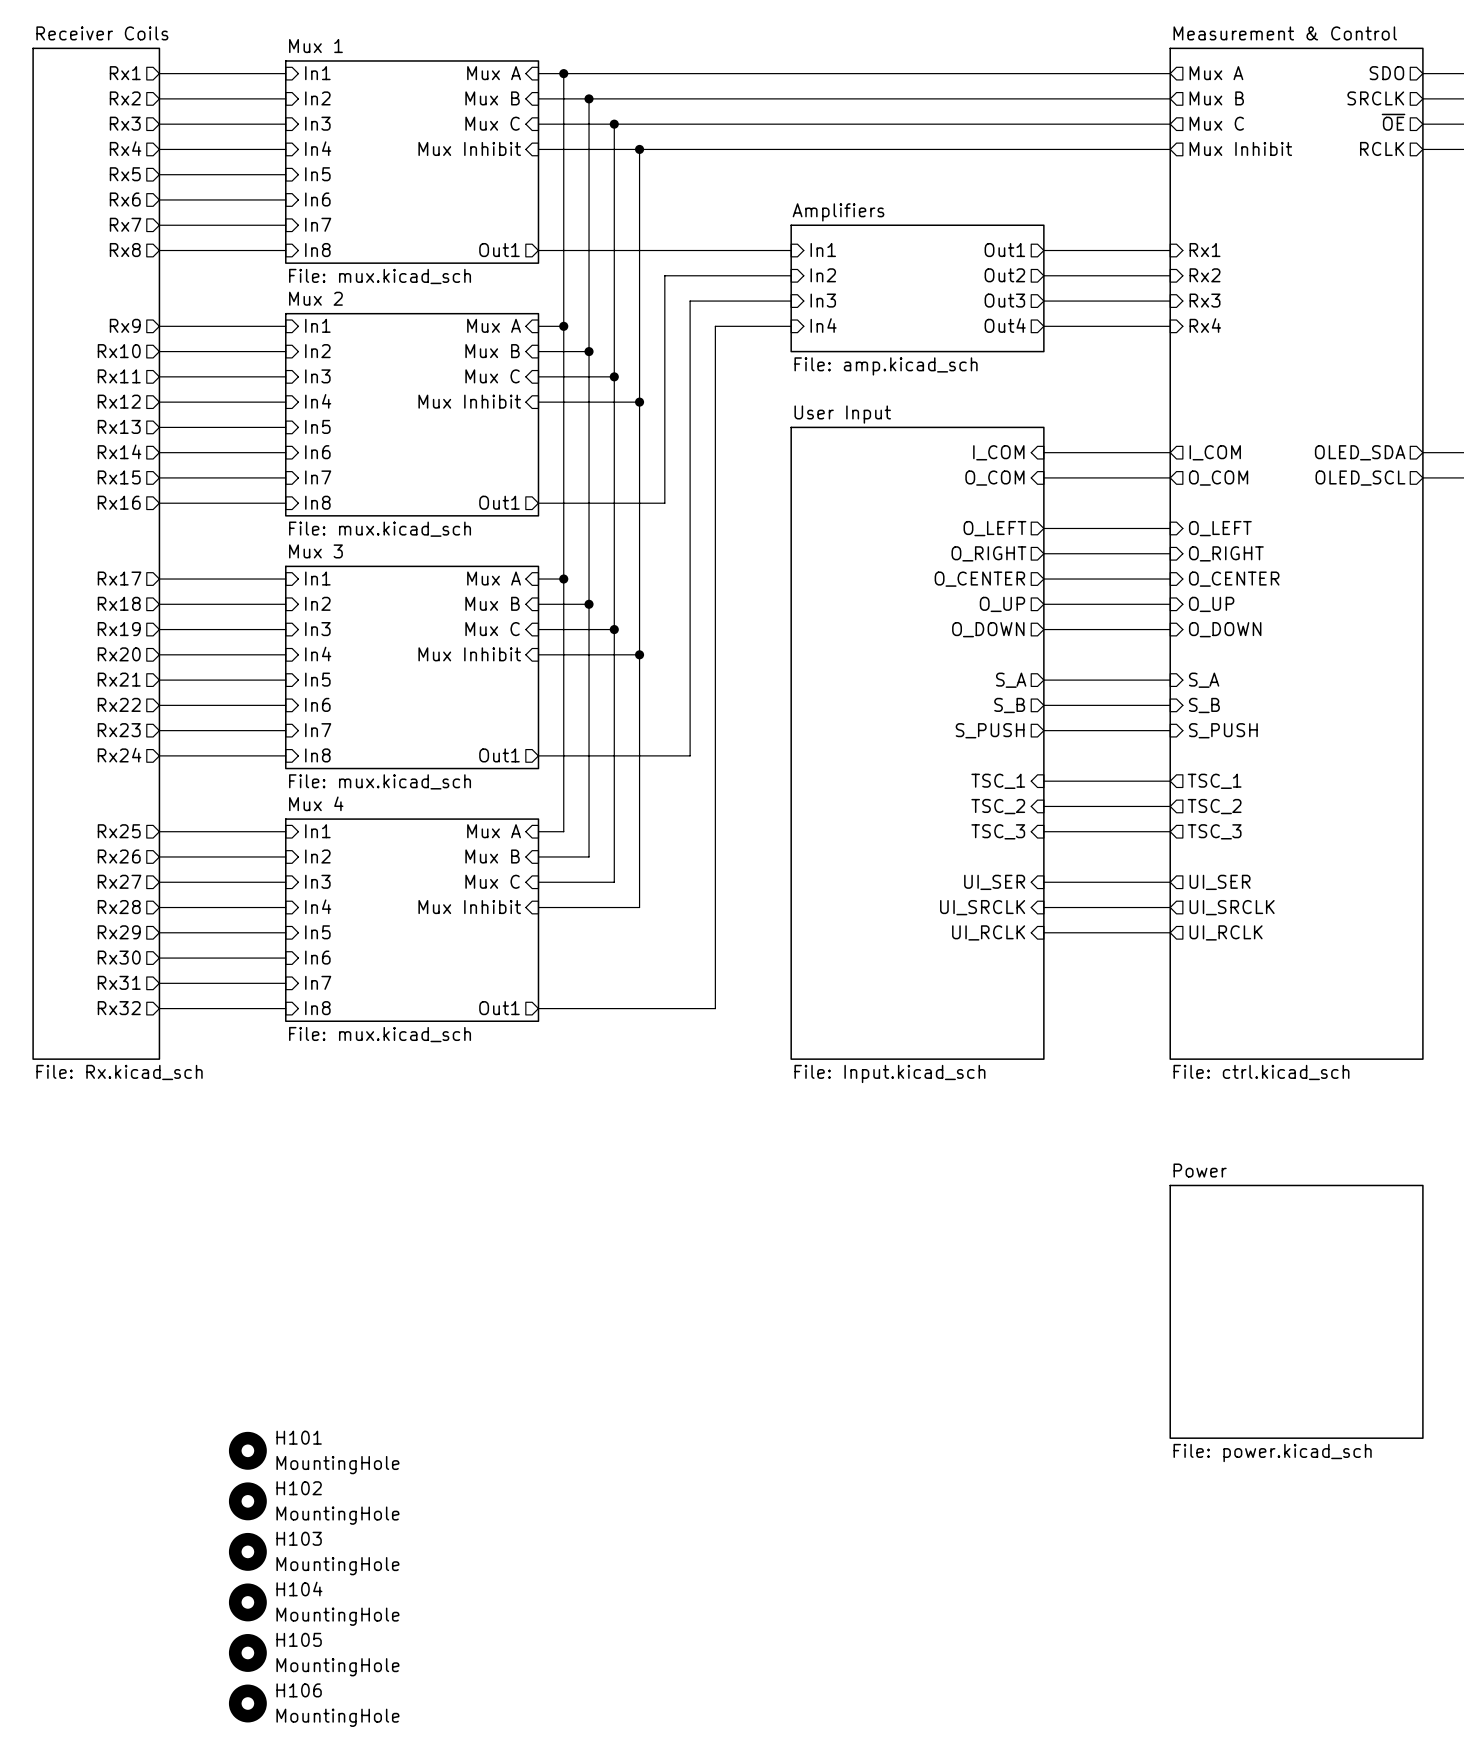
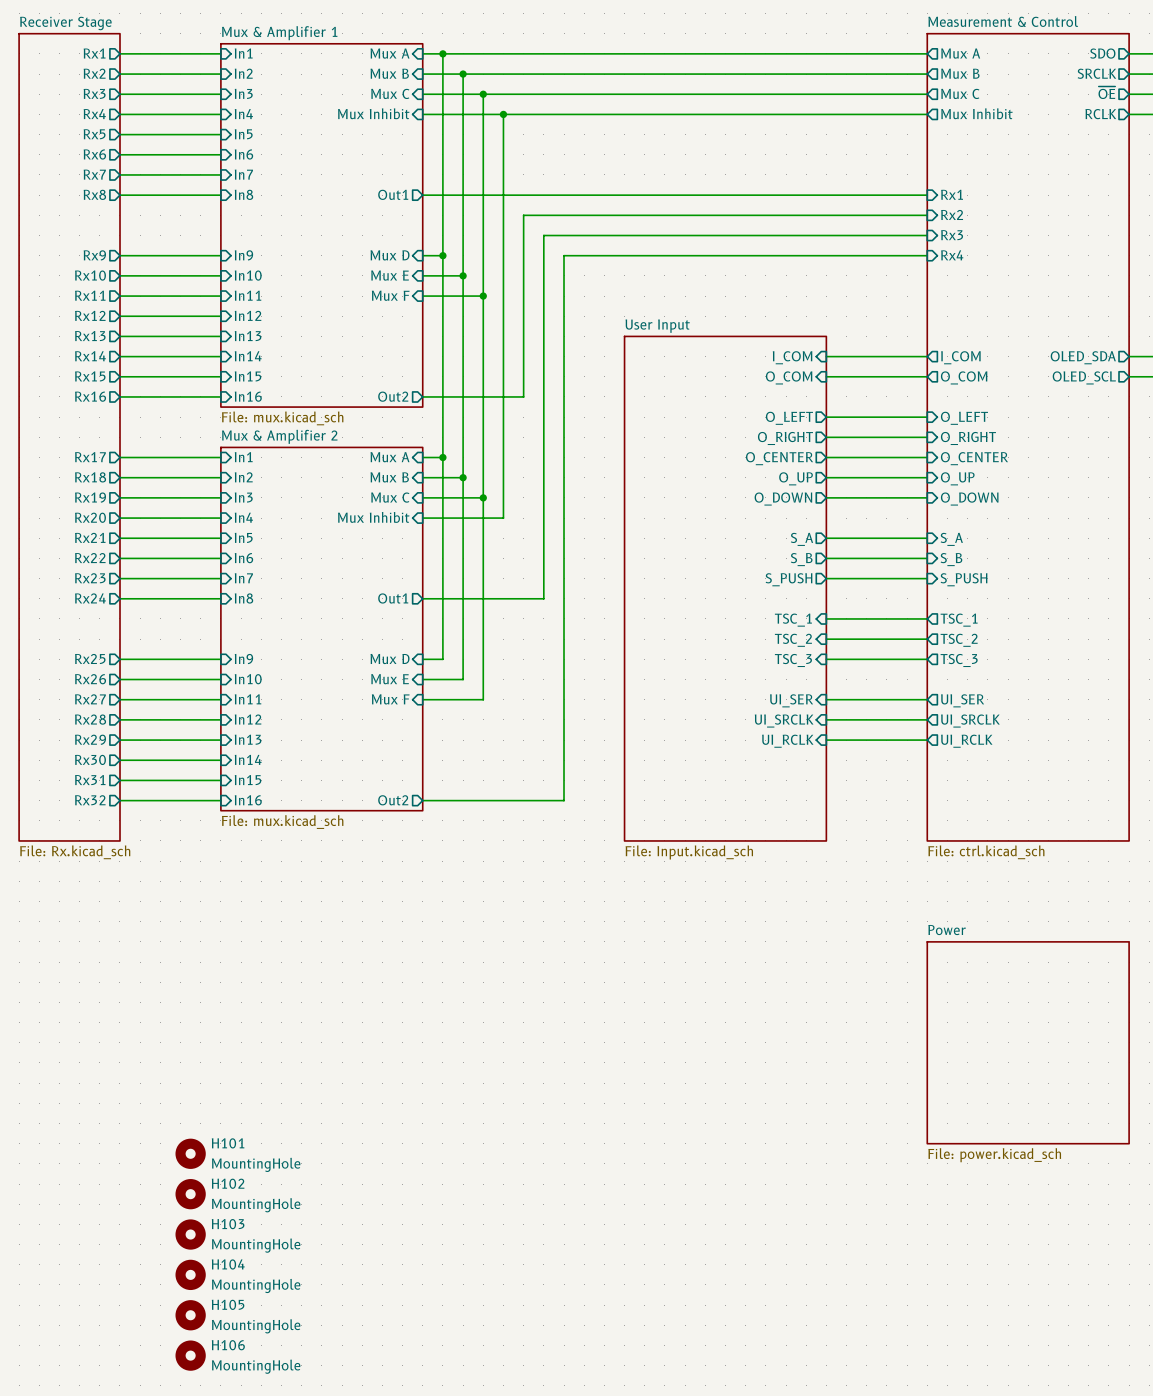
sheet Receiver Coils name: Receiver Coils (102, 33) -> Receiver Stage (65, 23)
sheet Mux 1: File: mux.kicad_sch (412, 162) -> none
wire: none -> (624, 195) (826, 195)
sheet pin: In1 (823, 250) -> none
sheet pin: Out1 (1004, 250) -> none
wire: none -> (624, 215) (826, 215)
sheet pin: In2 (823, 275) -> none
sheet pin: Out2 (1004, 275) -> none
sheet Mux & Amplifier 1: none -> File: mux.kicad_sch (321, 225)
sheet Amplifiers: File: amp.kicad_sch (917, 288) -> none
sheet pin: In3 (823, 300) -> none
sheet pin: Out3 (1004, 300) -> none
wire: none -> (624, 235) (826, 235)
sheet pin: In1 (317, 325) -> In9 (243, 255)
sheet pin: Mux A (494, 325) -> Mux D (390, 255)
sheet pin: In4 (823, 325) -> none
sheet pin: Out4 (1005, 325) -> none
wire: none -> (624, 255) (826, 255)
sheet pin: In2 (317, 351) -> In10 (248, 275)
sheet pin: Mux B (492, 351) -> Mux E (390, 275)
sheet pin: In3 (317, 376) -> In11 (248, 295)
sheet pin: Mux C (492, 376) -> Mux F (390, 295)
sheet pin: In4 (318, 401) -> In12 (248, 315)
sheet pin: Mux Inhibit (469, 401) -> none
wire: (538, 402) (639, 402) -> none
junction: (639, 402) -> none
sheet Mux 2: File: mux.kicad_sch (412, 414) -> none
sheet pin: In5 (317, 426) -> In13 (248, 336)
sheet pin: In6 (317, 452) -> In14 (248, 356)
sheet pin: In7 (318, 477) -> In15 (248, 376)
sheet pin: In8 (317, 502) -> In16 (248, 396)
sheet pin: Out1 (499, 502) -> Out2 (393, 396)
wire: (639, 654) (639, 907) (538, 907) -> none
junction: (639, 654) -> none
sheet Mux 3: File: mux.kicad_sch (412, 667) -> none
sheet Mux & Amplifier 2: none -> File: mux.kicad_sch (321, 629)
sheet pin: In1 (317, 831) -> In9 (243, 659)
sheet pin: Mux A (494, 831) -> Mux D (390, 659)
sheet pin: In2 (317, 856) -> In10 (248, 679)
sheet pin: Mux B (492, 856) -> Mux E (390, 679)
sheet pin: In3 (317, 881) -> In11 (248, 699)
sheet pin: Mux C (492, 881) -> Mux F (390, 699)
sheet pin: In4 (318, 906) -> In12 (248, 719)
sheet pin: Mux Inhibit (469, 907) -> none
sheet Mux 4: File: mux.kicad_sch (412, 920) -> none
sheet pin: In5 (317, 932) -> In13 (248, 739)
sheet pin: In6 (317, 957) -> In14 (248, 759)
sheet pin: In7 (318, 982) -> In15 (248, 780)
sheet pin: In8 (317, 1008) -> In16 (248, 800)
sheet pin: Out1 (499, 1008) -> Out2 (393, 800)

